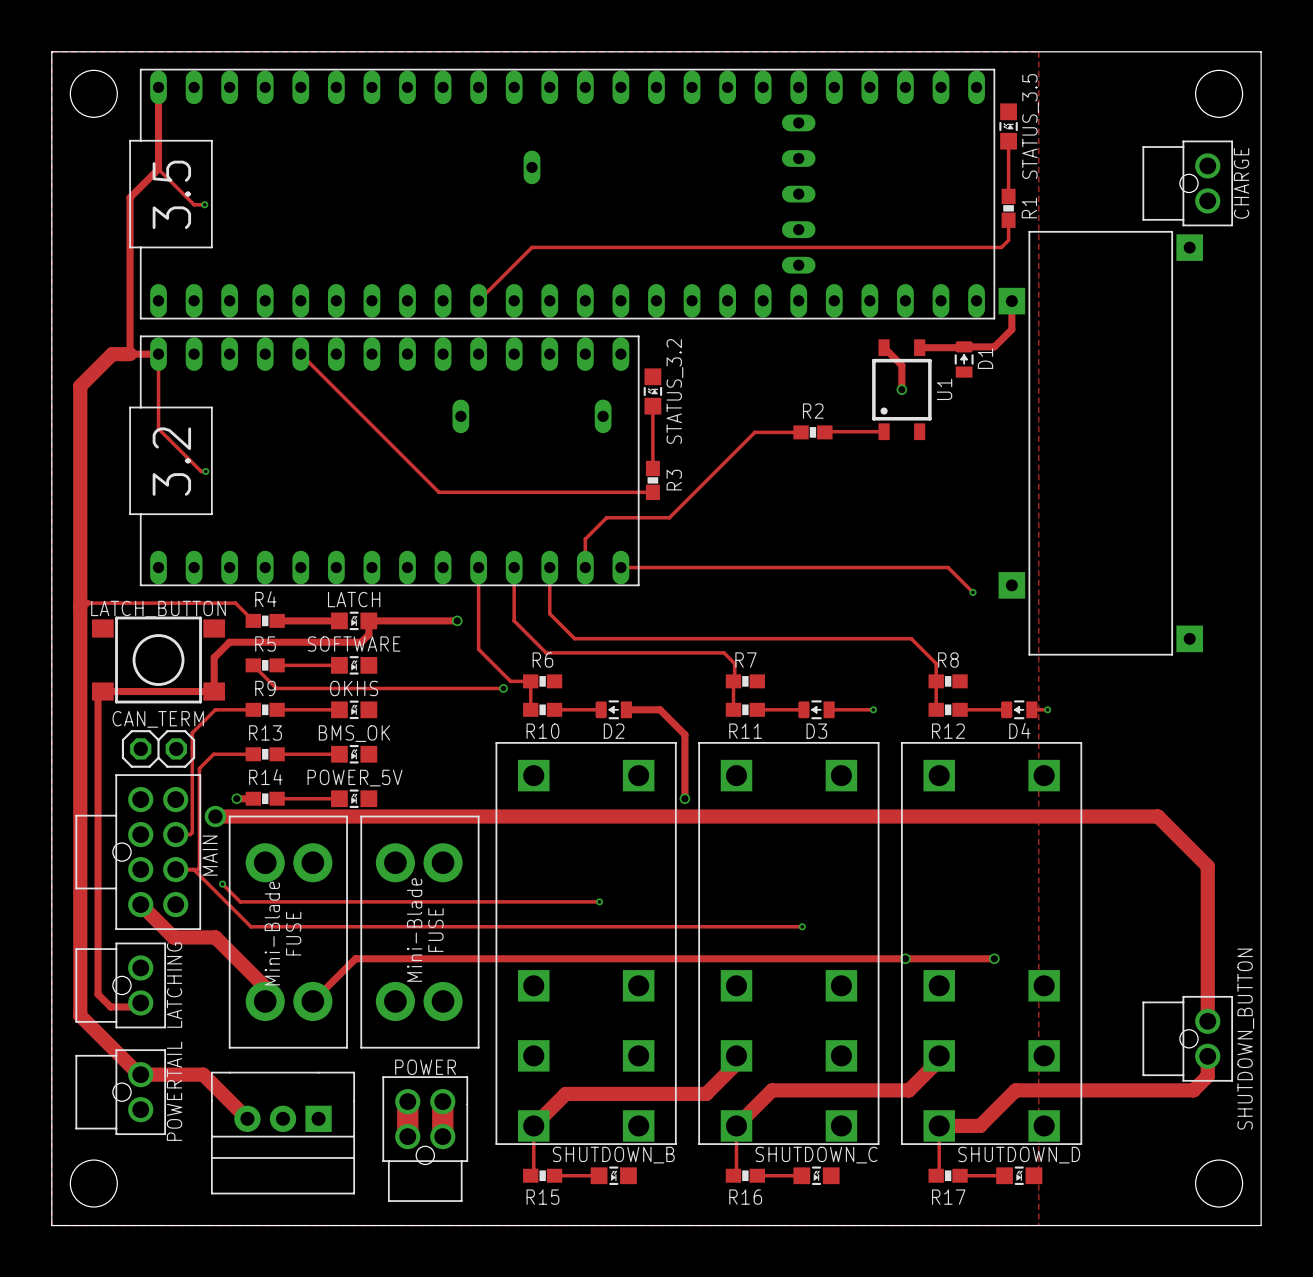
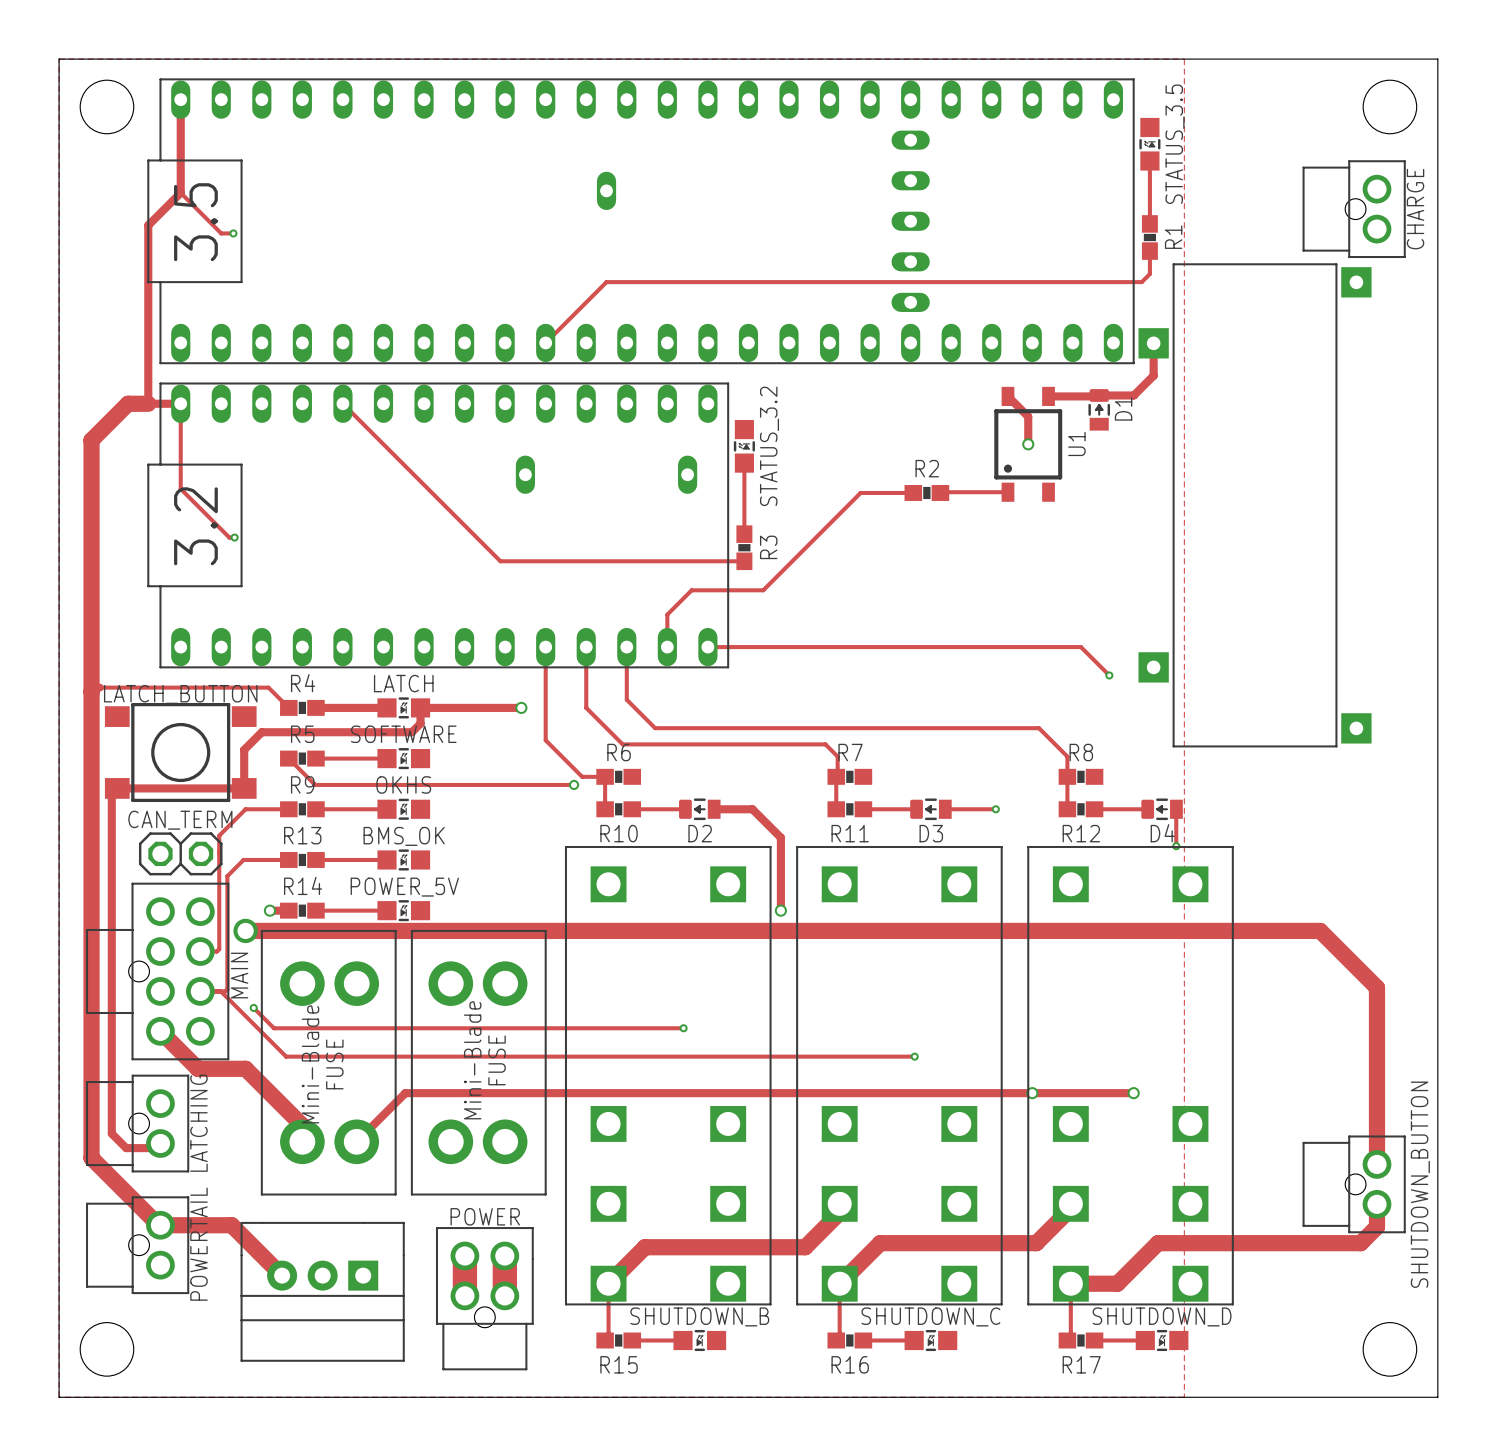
track: (1031, 709) (1047, 709) -> (1176, 809) (1176, 846)
via position: (1047, 709) -> (1176, 846)

